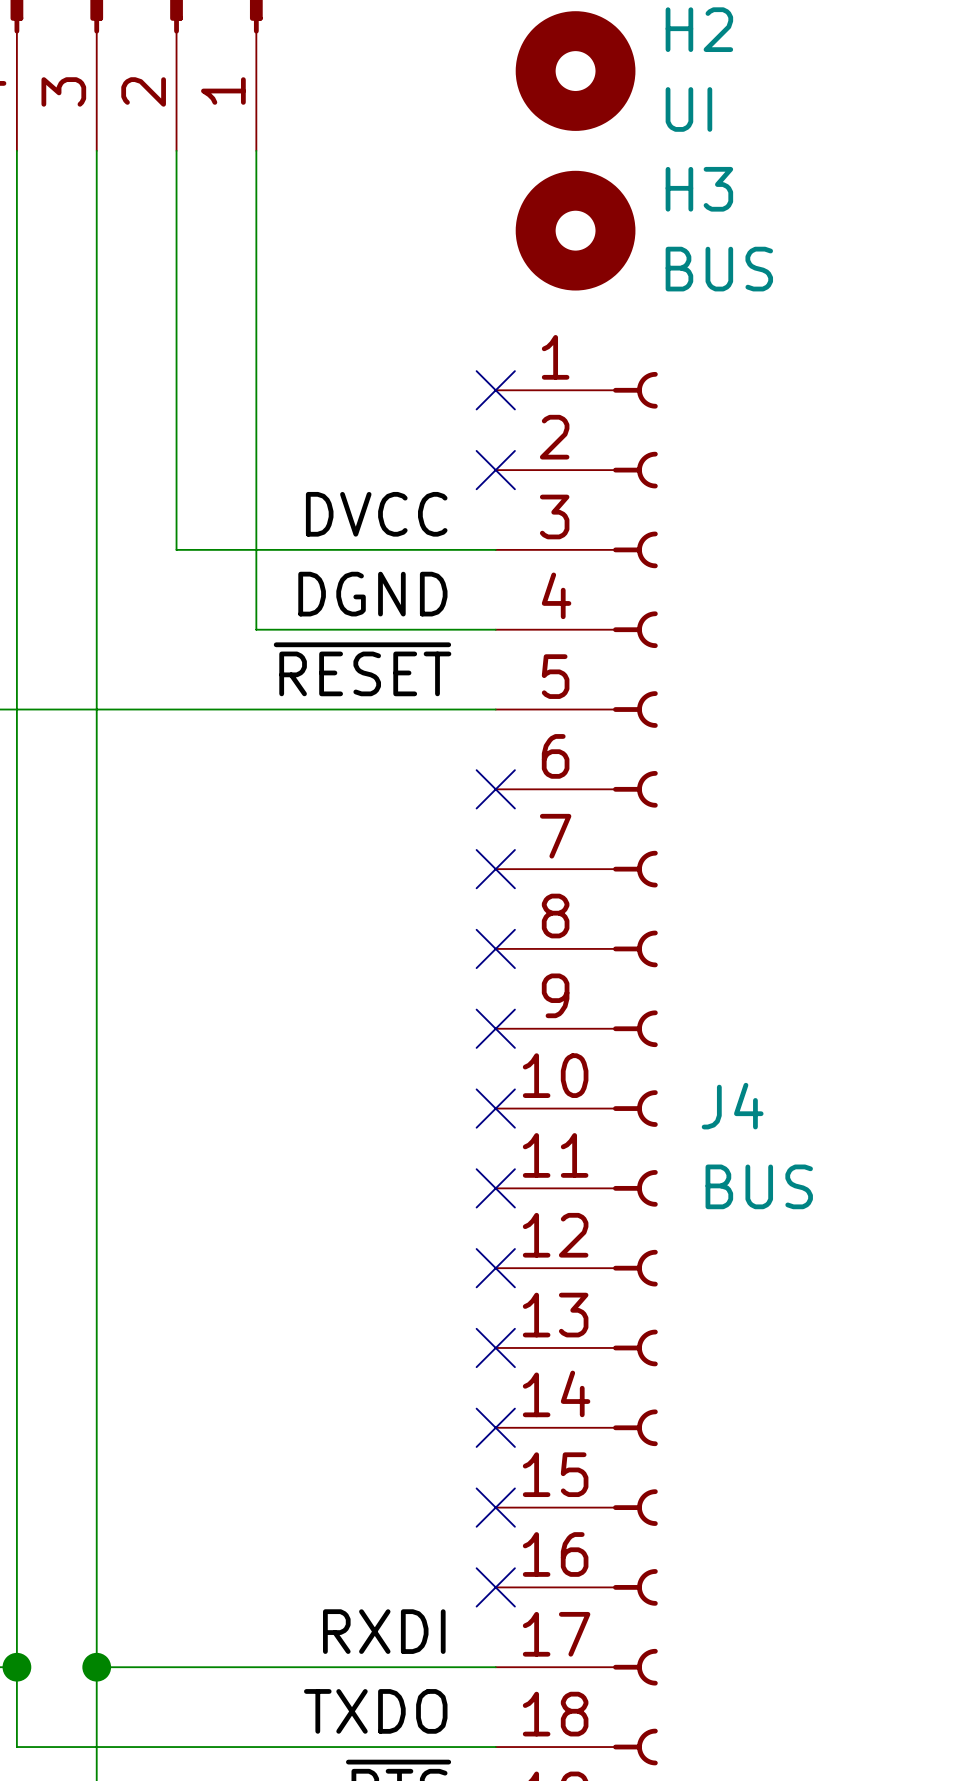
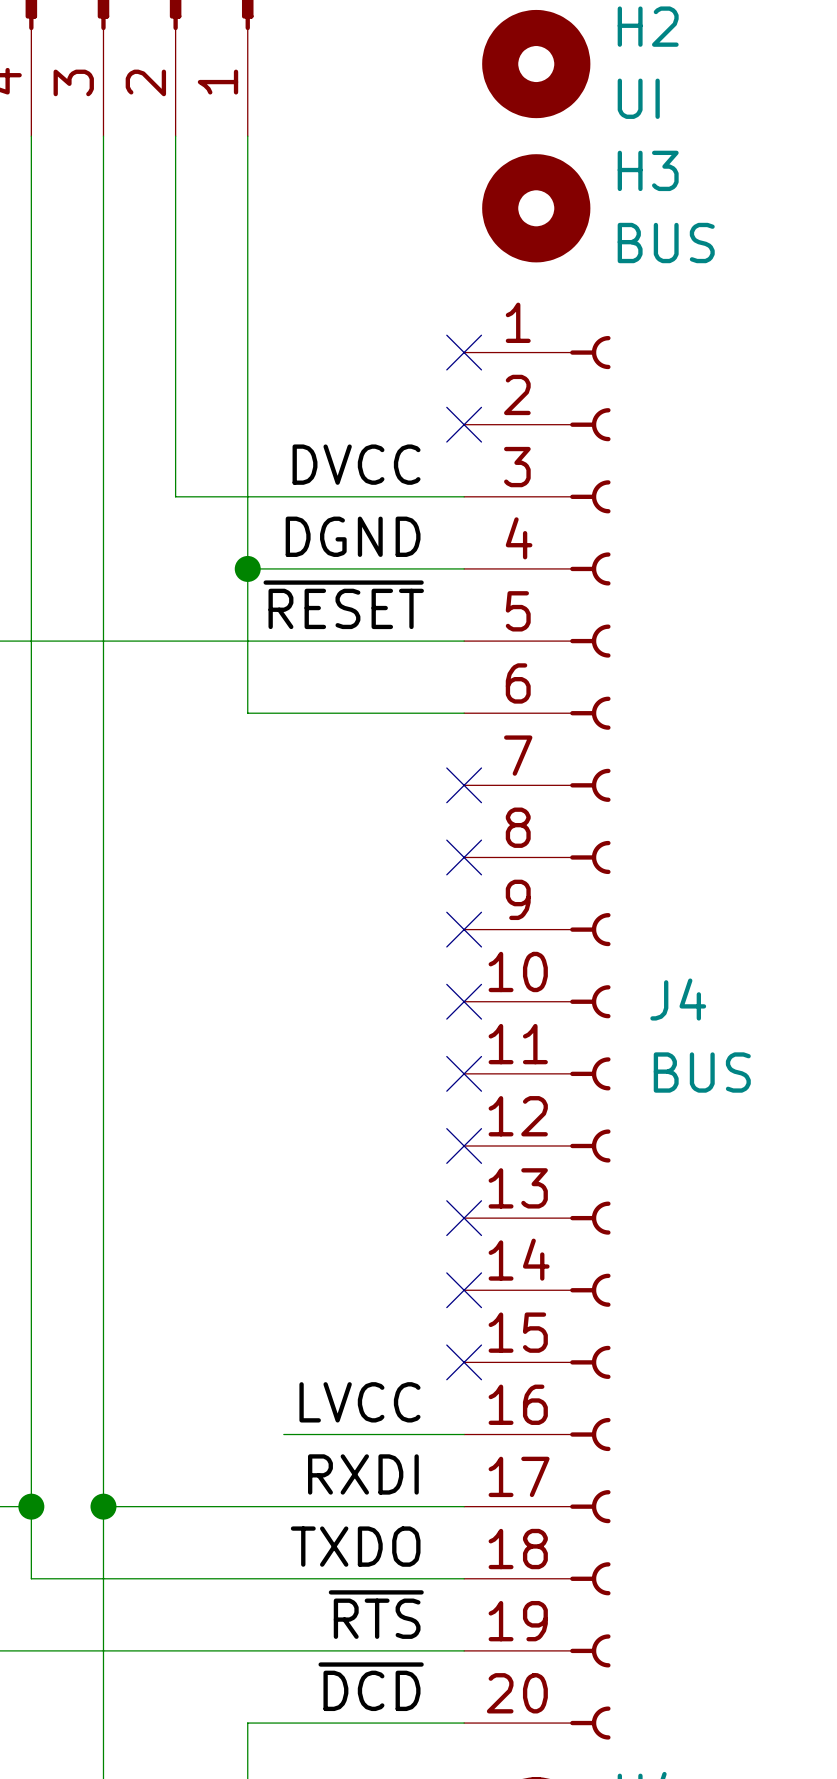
wire: none -> (247, 568) (247, 713) (464, 713)
junction: none -> (247, 568)
no-connect mark: (495, 789) -> none
label: none -> LVCC (359, 1402)
wire: none -> (283, 1434) (464, 1434)
no-connect mark: (495, 1587) -> none

